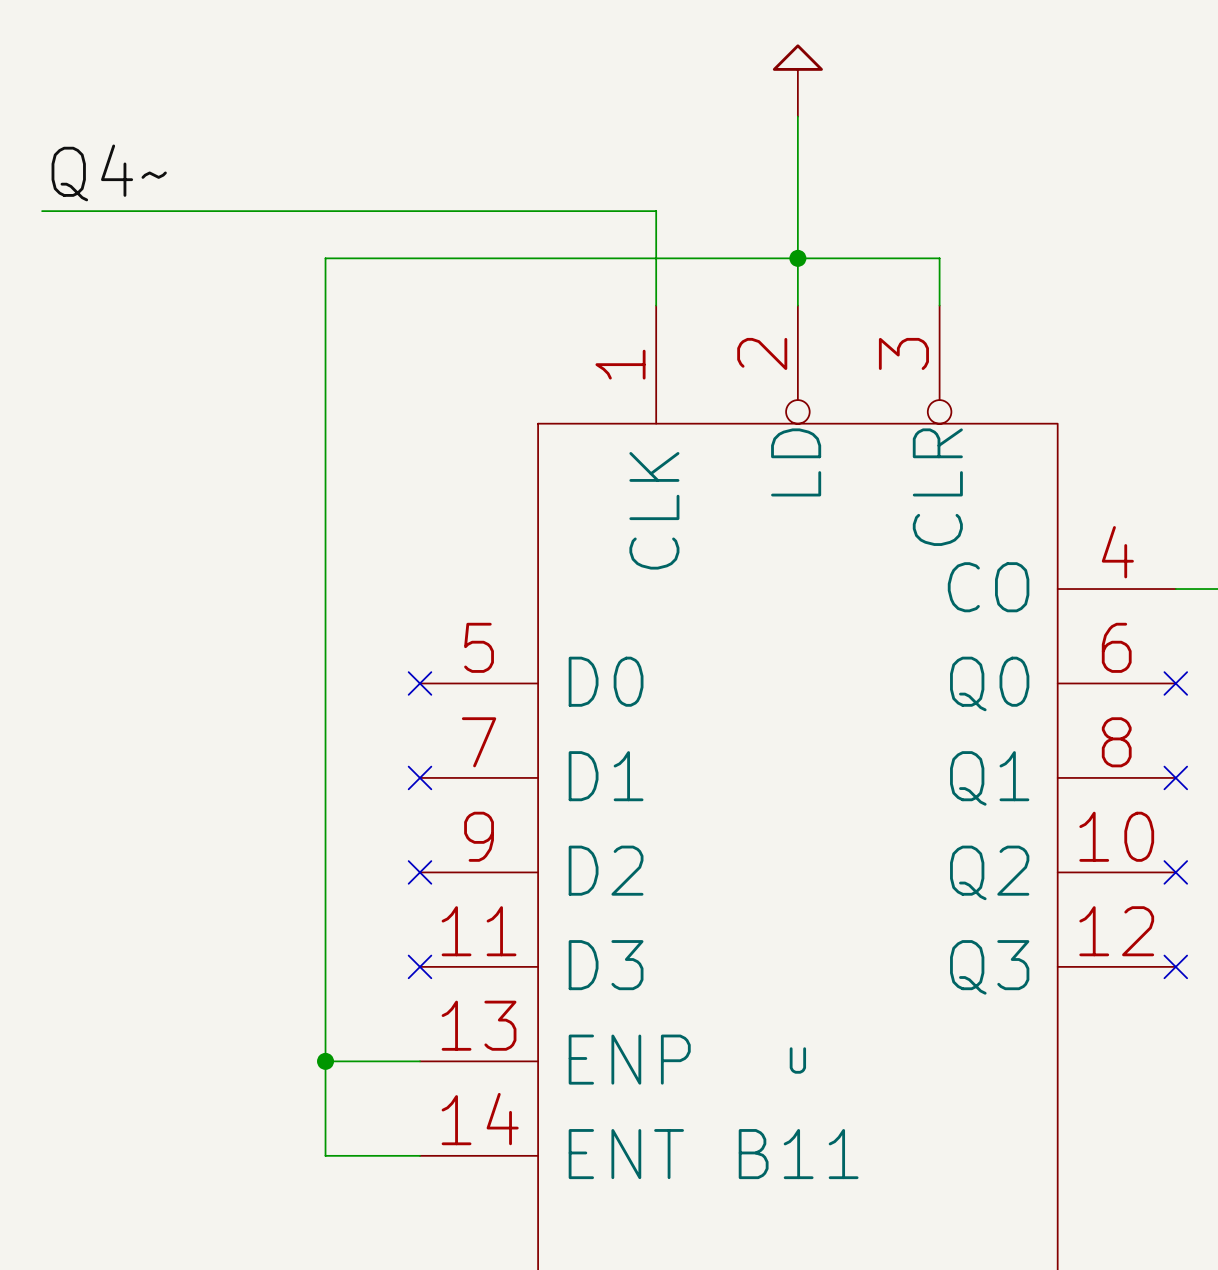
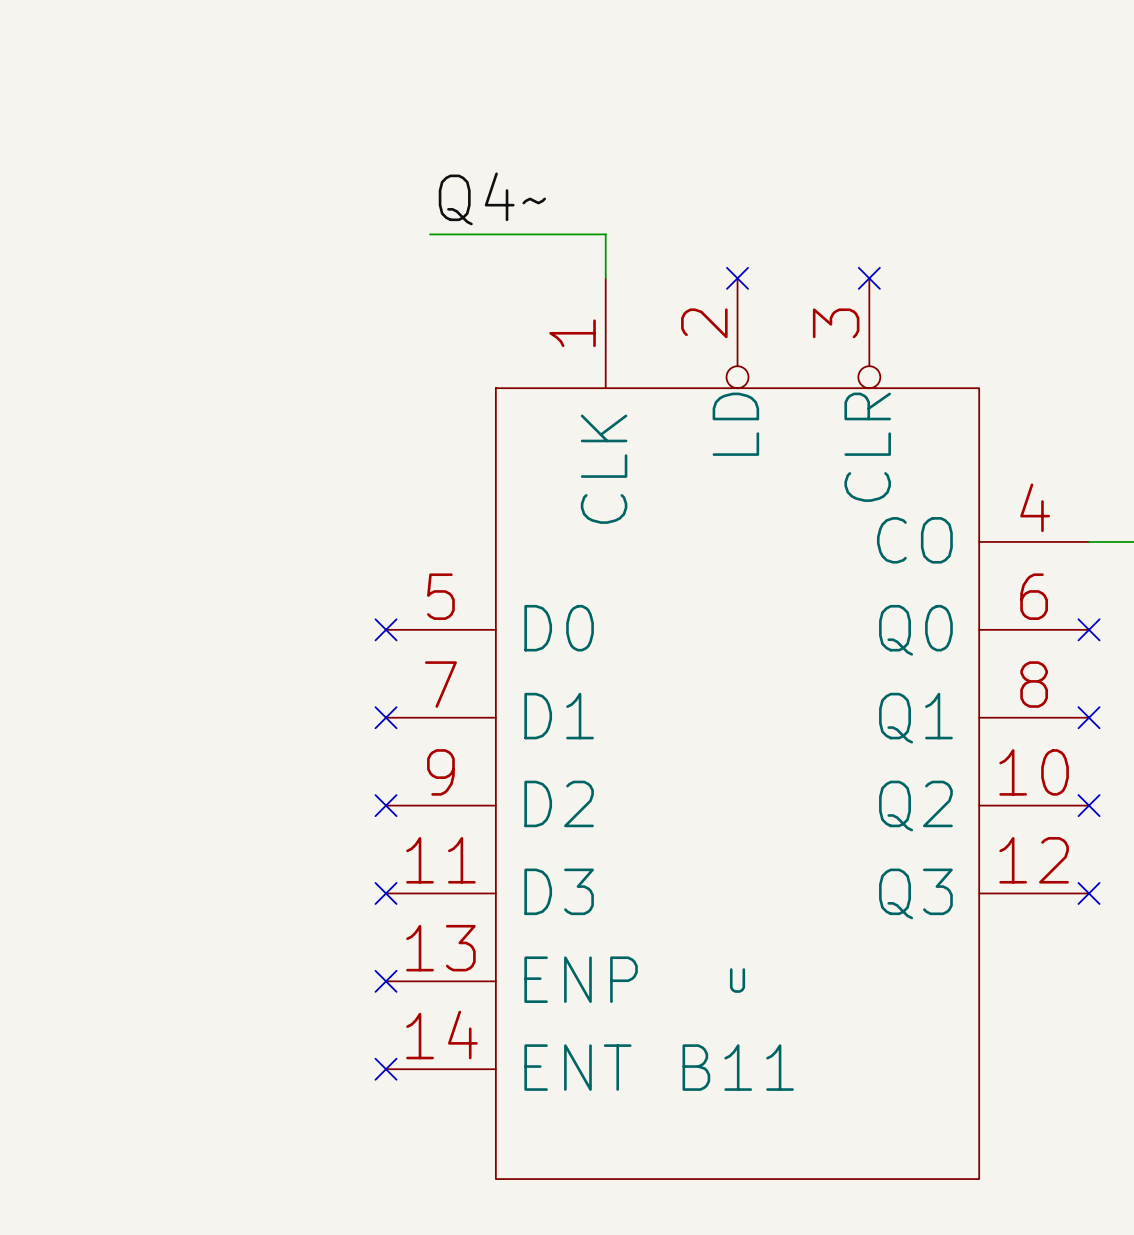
power symbol: (797, 80) -> none
wire: (797, 116) (797, 305) -> none
label position: Q4~ (109, 172) -> Q4~ (492, 198)
wire: (42, 211) (656, 211) (656, 258) (939, 258) (939, 305) -> none
wire: (467, 258) (325, 258) (325, 1155) (419, 1155) -> none
junction: (797, 258) -> none
no-connect mark: none -> (737, 278)
no-connect mark: none -> (869, 278)
wire: (325, 1061) (419, 1061) -> none
junction: (325, 1061) -> none
no-connect mark: none -> (386, 981)
no-connect mark: none -> (386, 1069)

